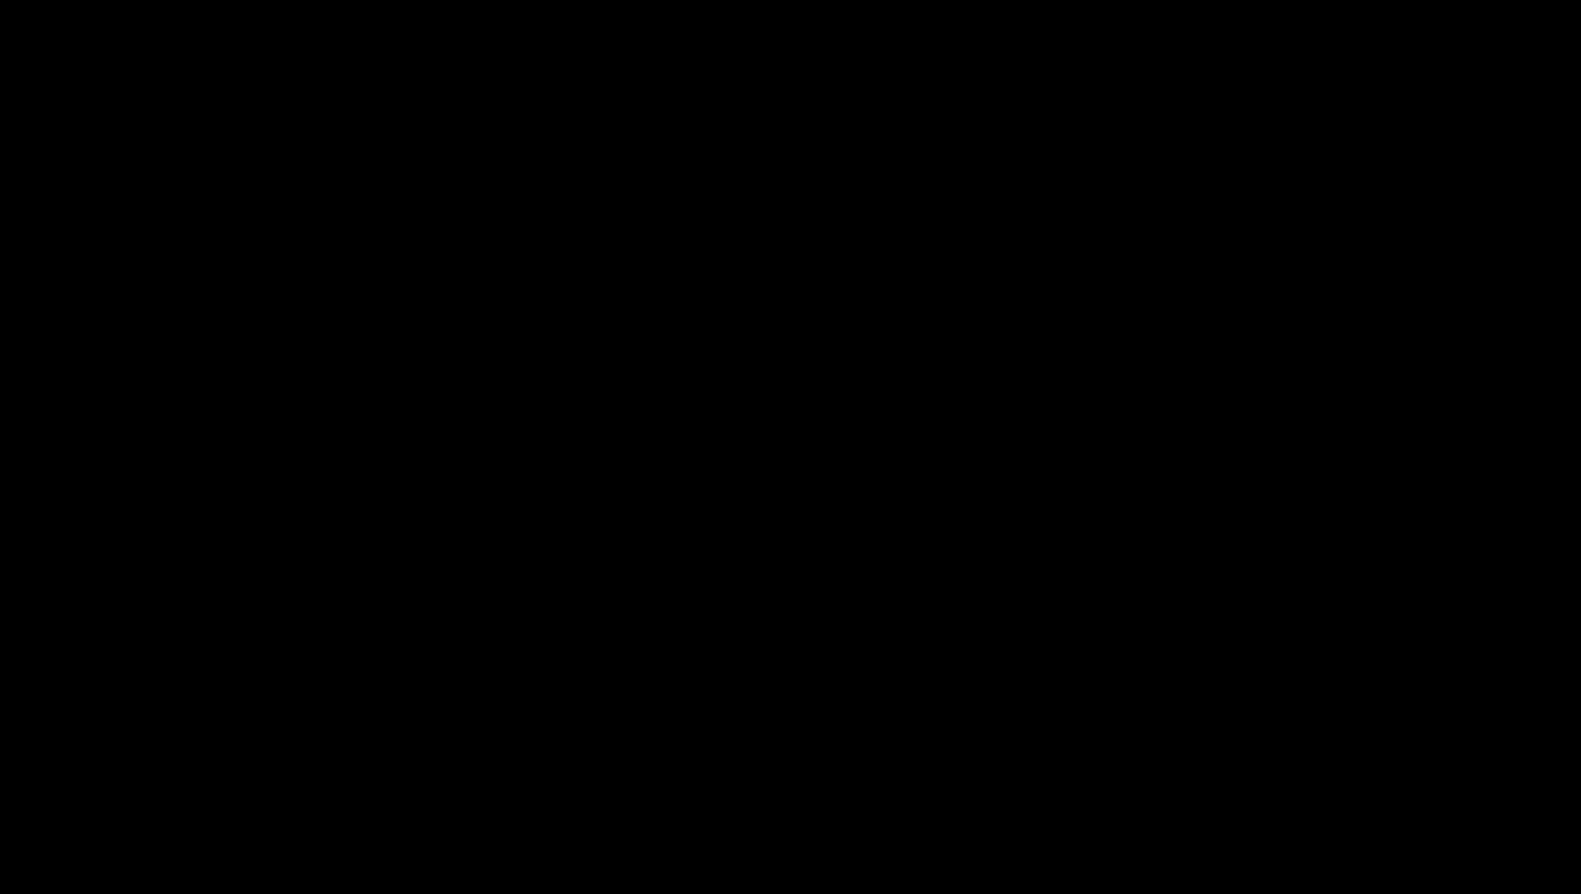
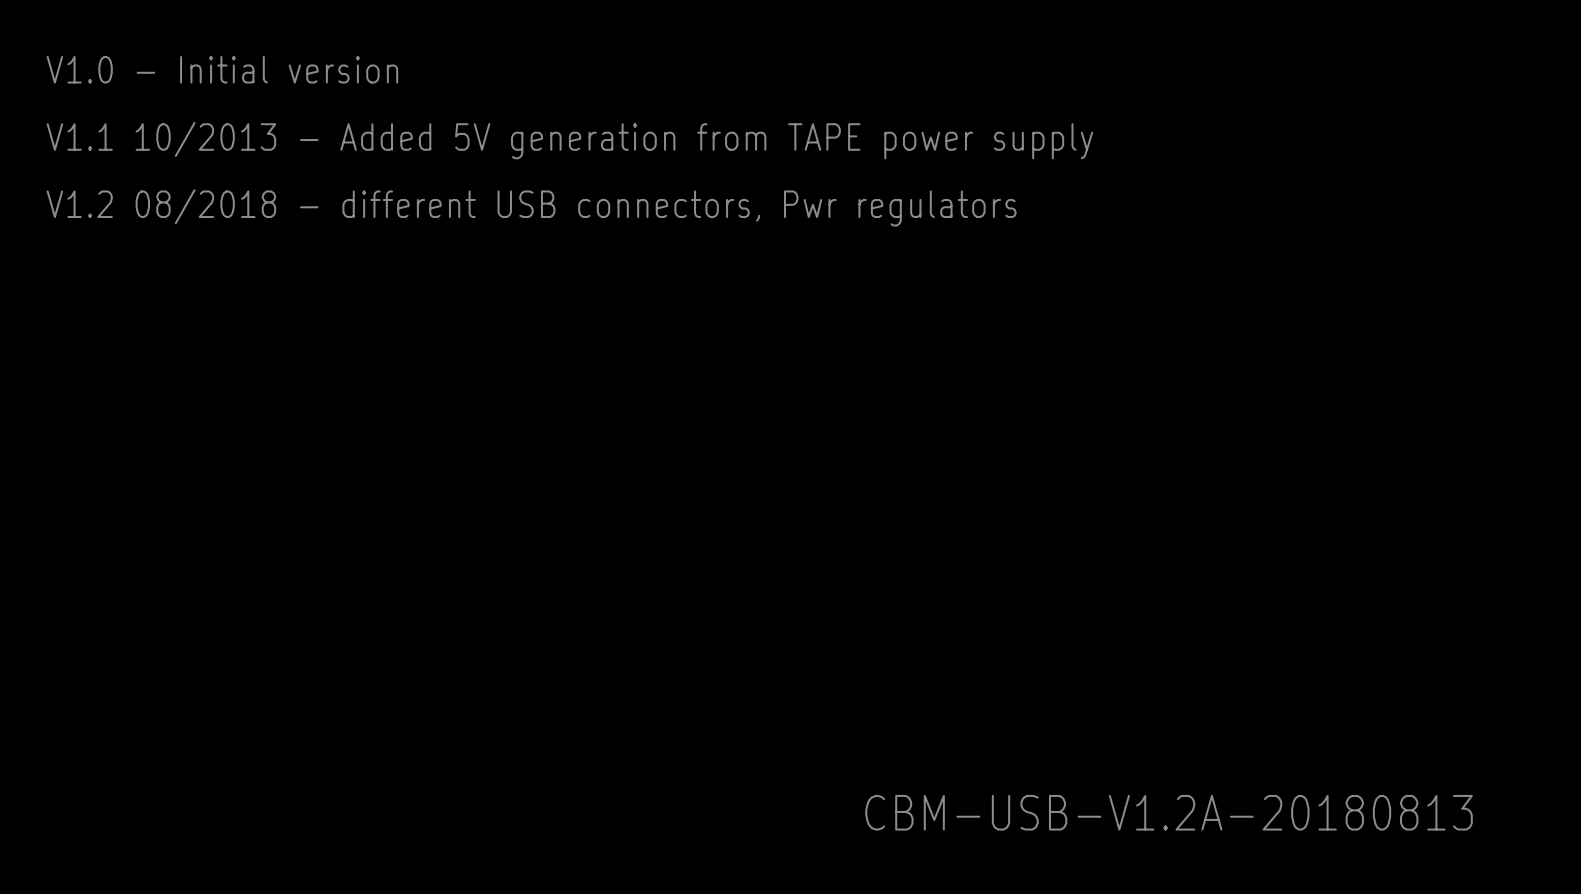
text: none -> V1.0 - Initial version (222, 69)
text: none -> V1.1 10/2013 - Added 5V generation from TAPE power supply (569, 140)
text: none -> V1.2 08/2018 - different USB connectors, Pwr regulators (531, 207)
text: none -> CBM-USB-V1.2A-20180813 (1169, 812)

